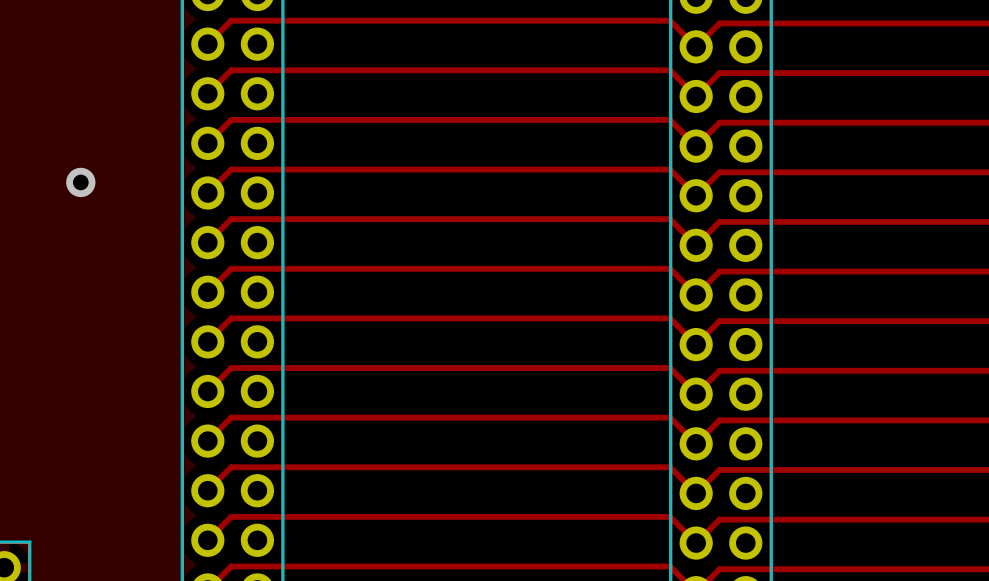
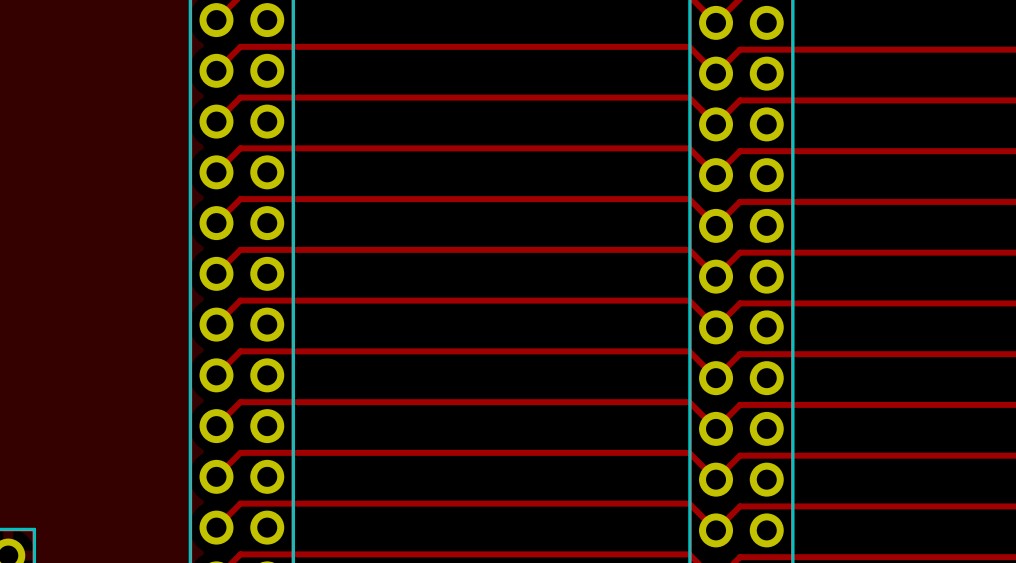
via: (80, 182) -> none

